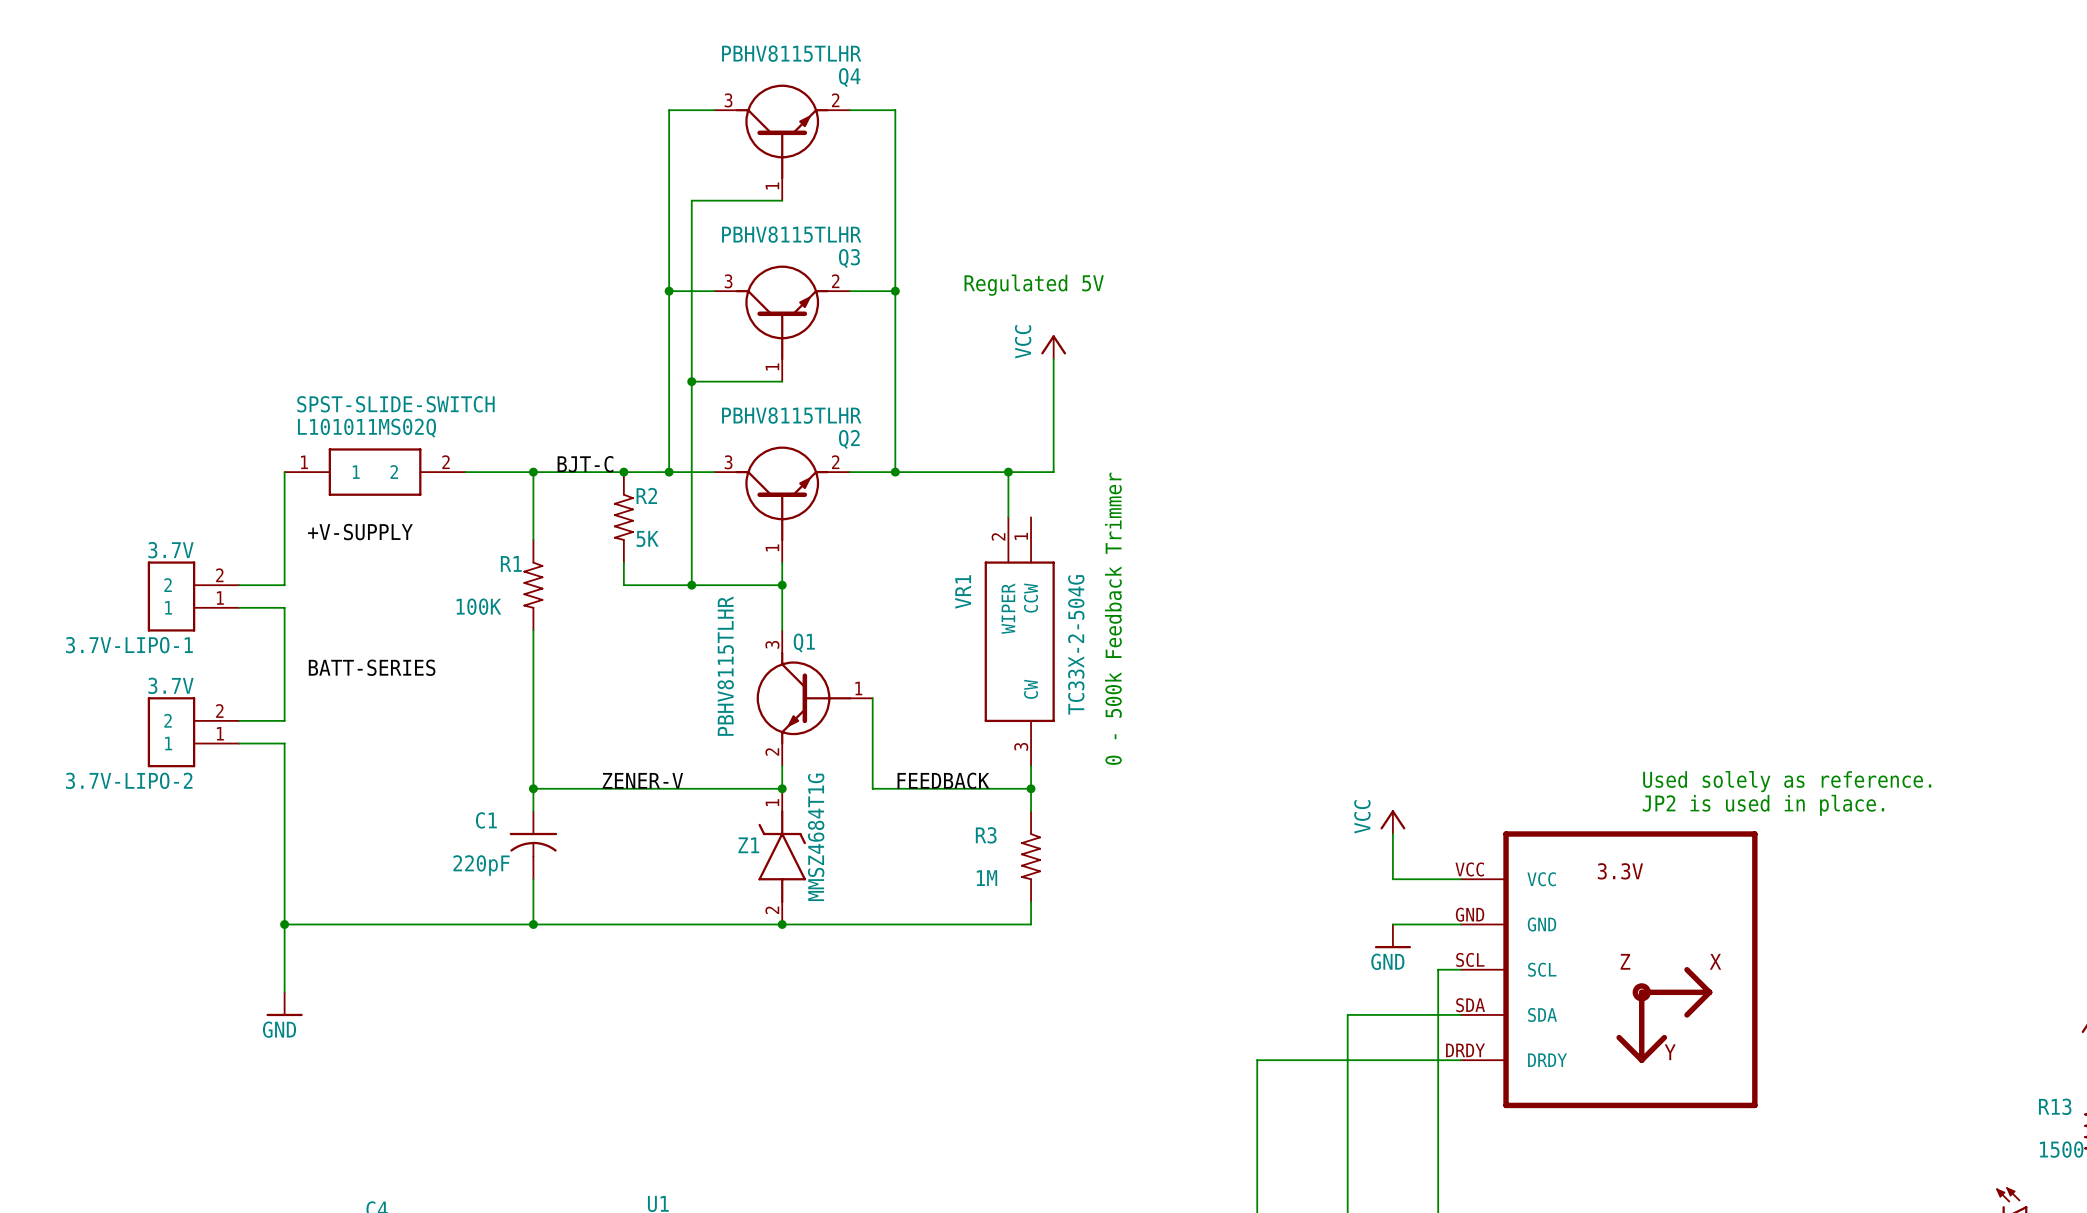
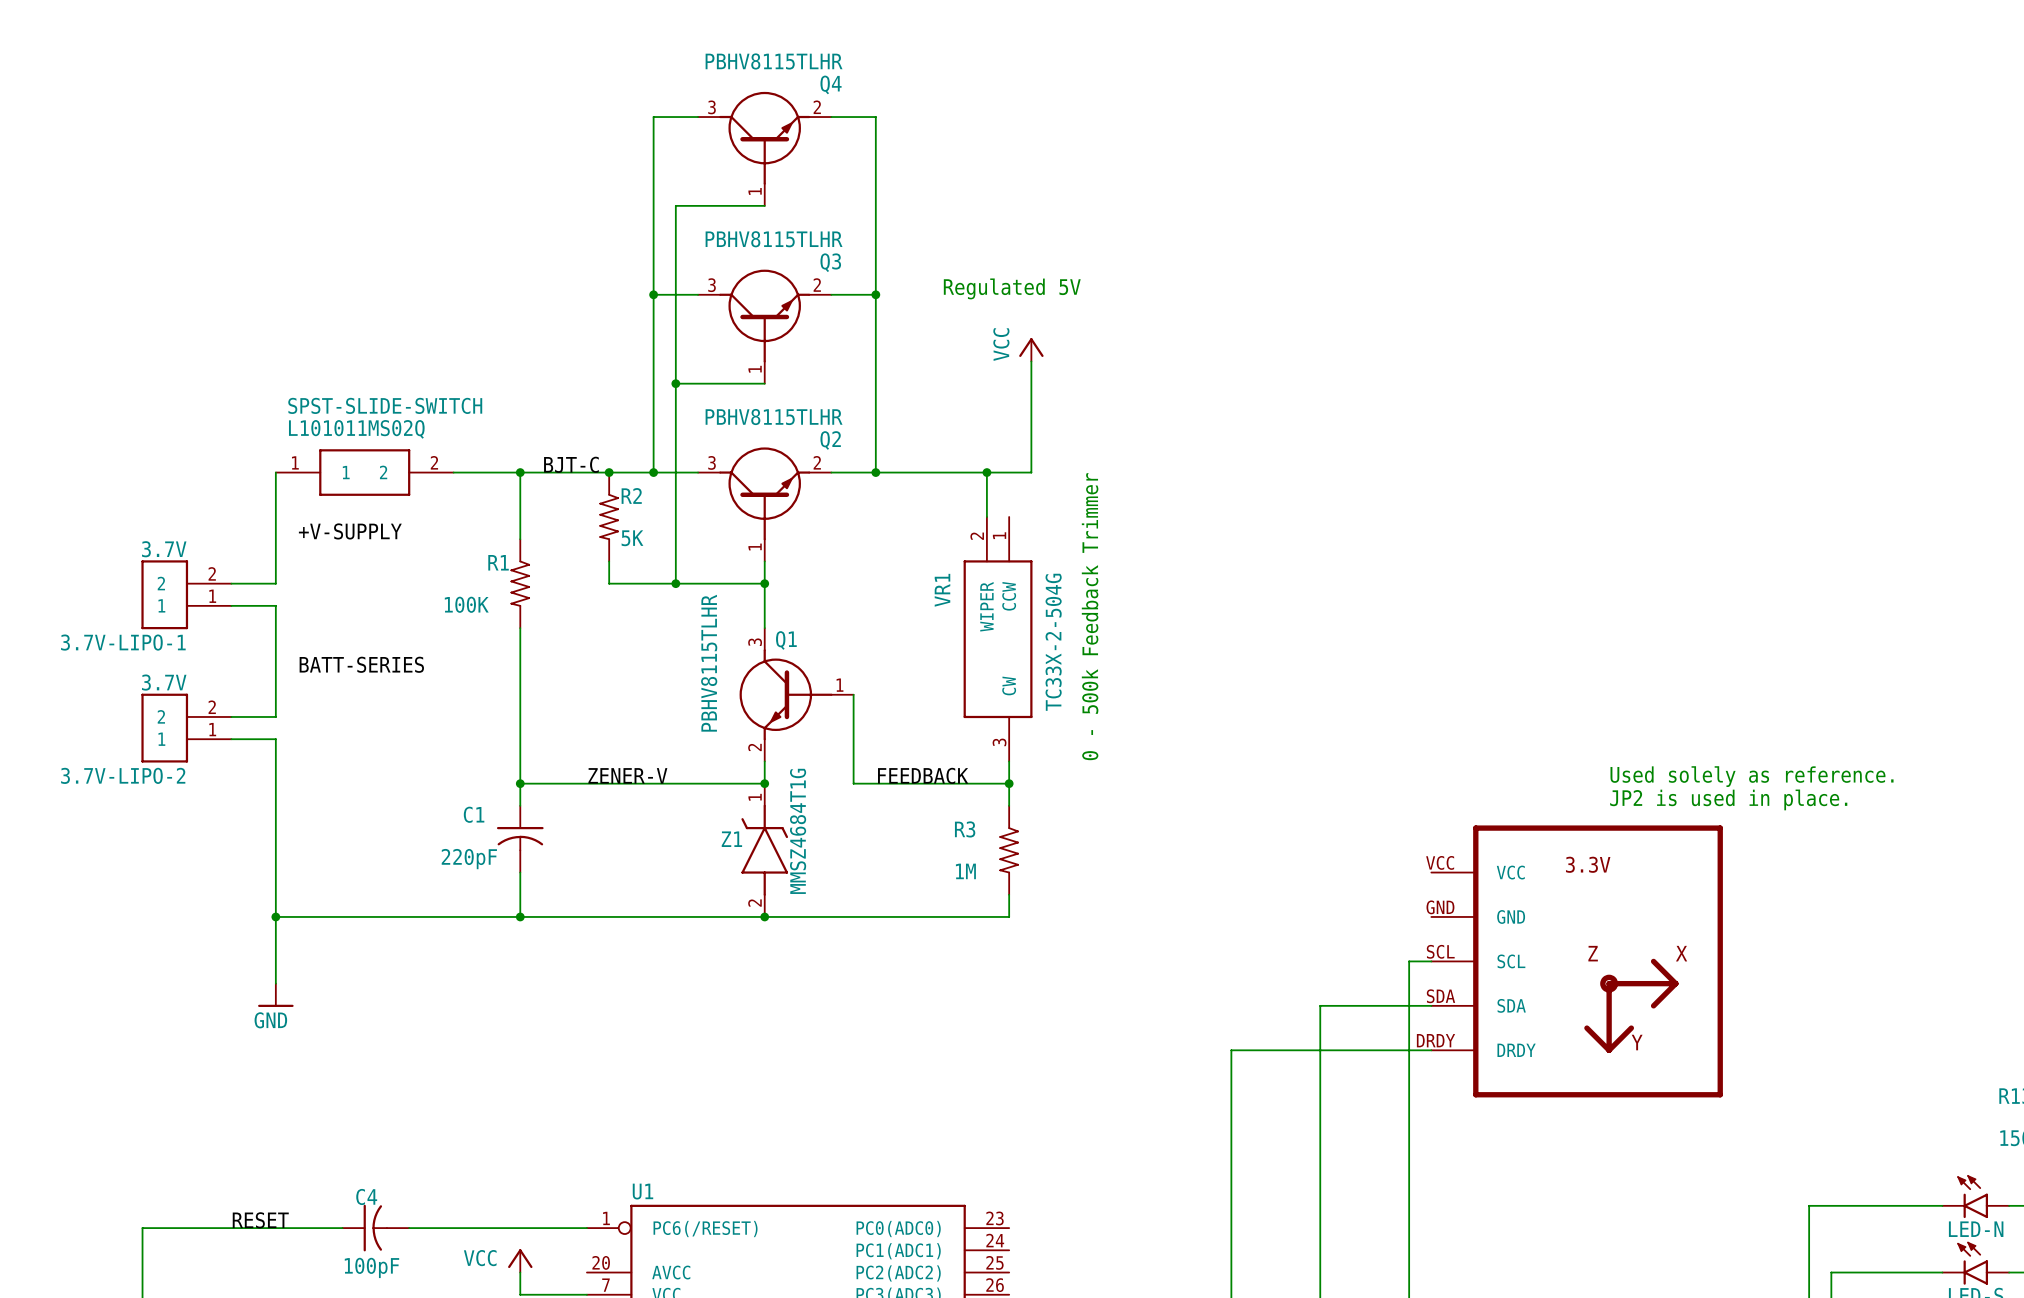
power symbol: VCC (1392, 822) -> none
wire: (1392, 834) (1392, 879) (1460, 879) -> none
wire: (1392, 924) (1460, 924) -> none
power symbol: GND (1392, 936) -> none

